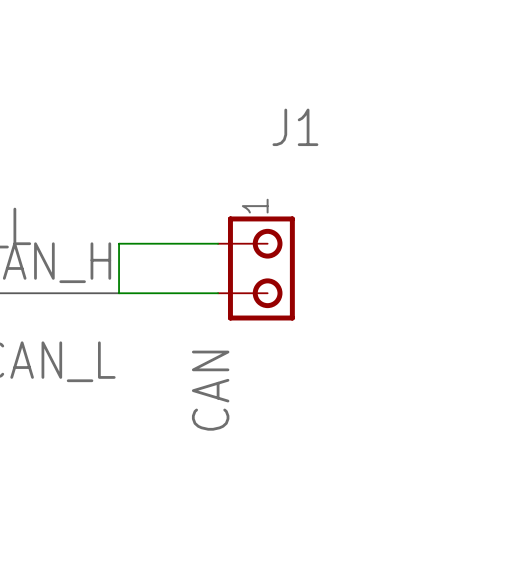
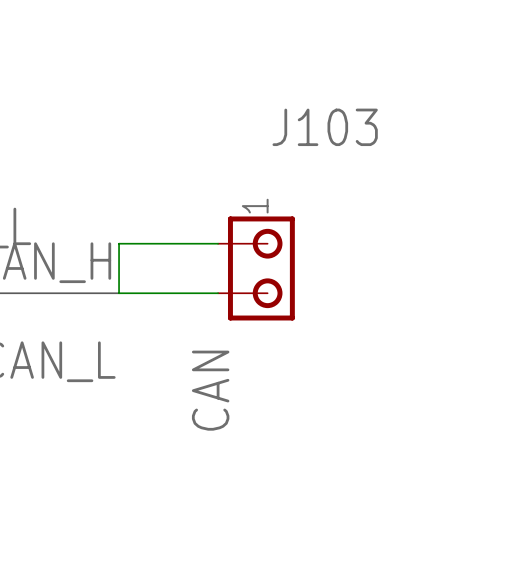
J1 name: J1 (295, 127) -> J103 (325, 127)

